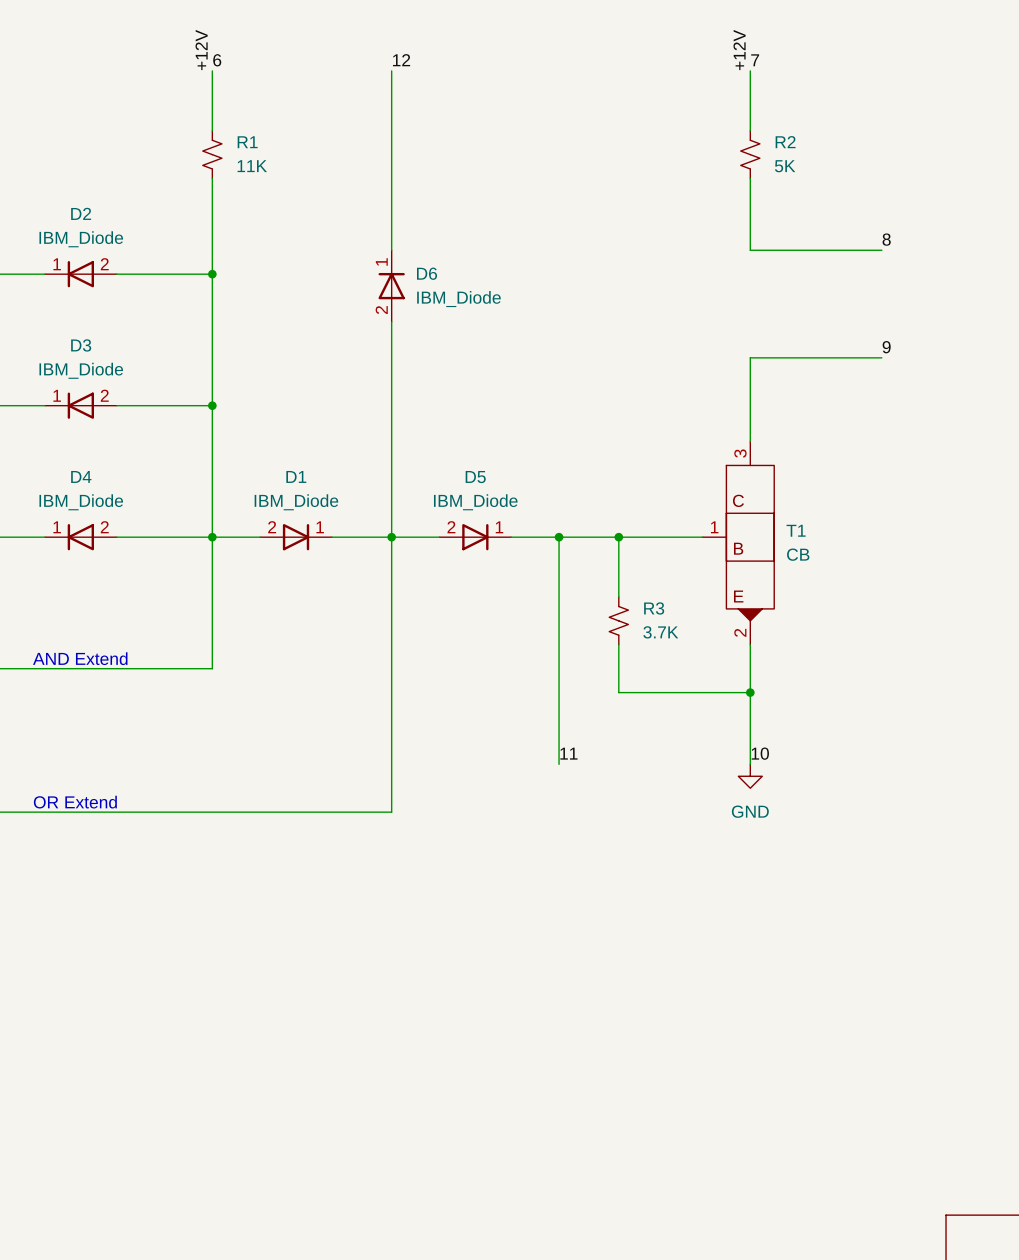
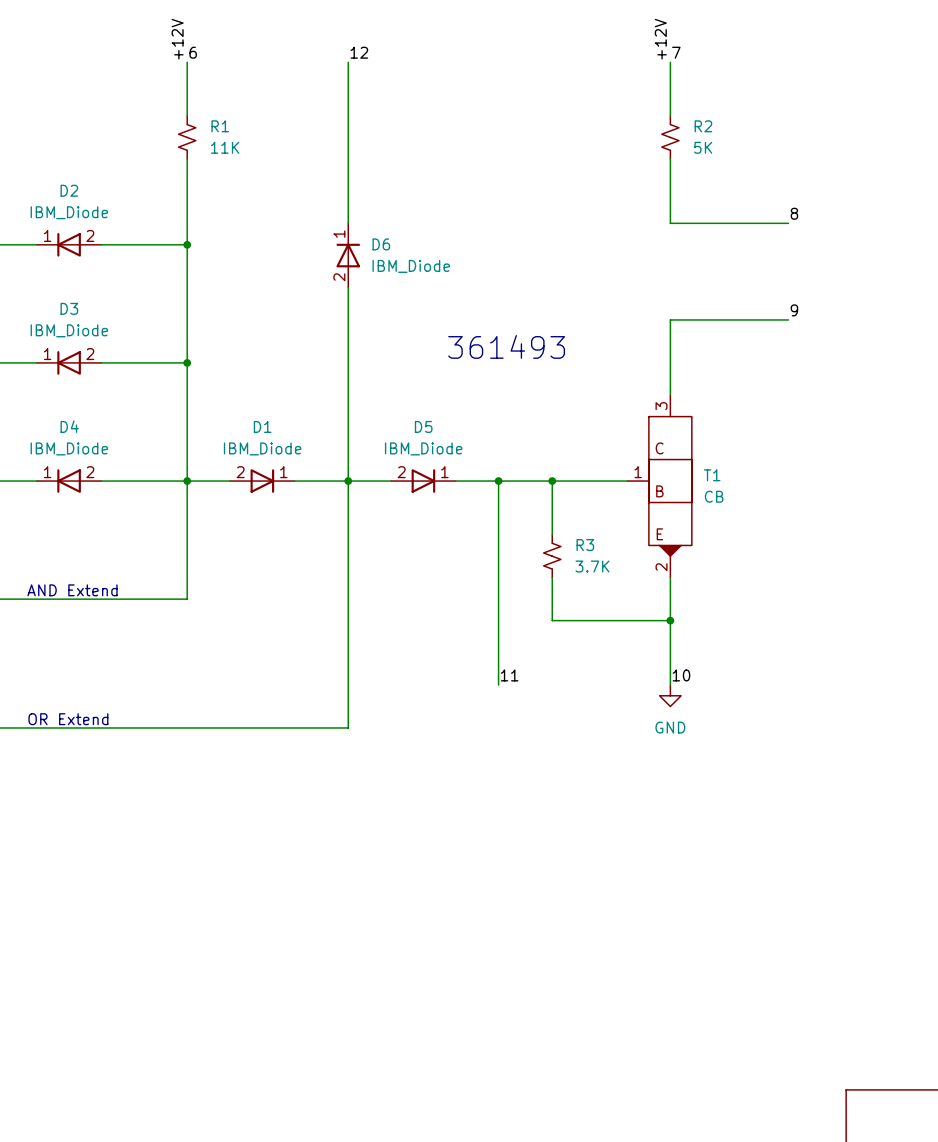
text: none -> 361493 (506, 346)

